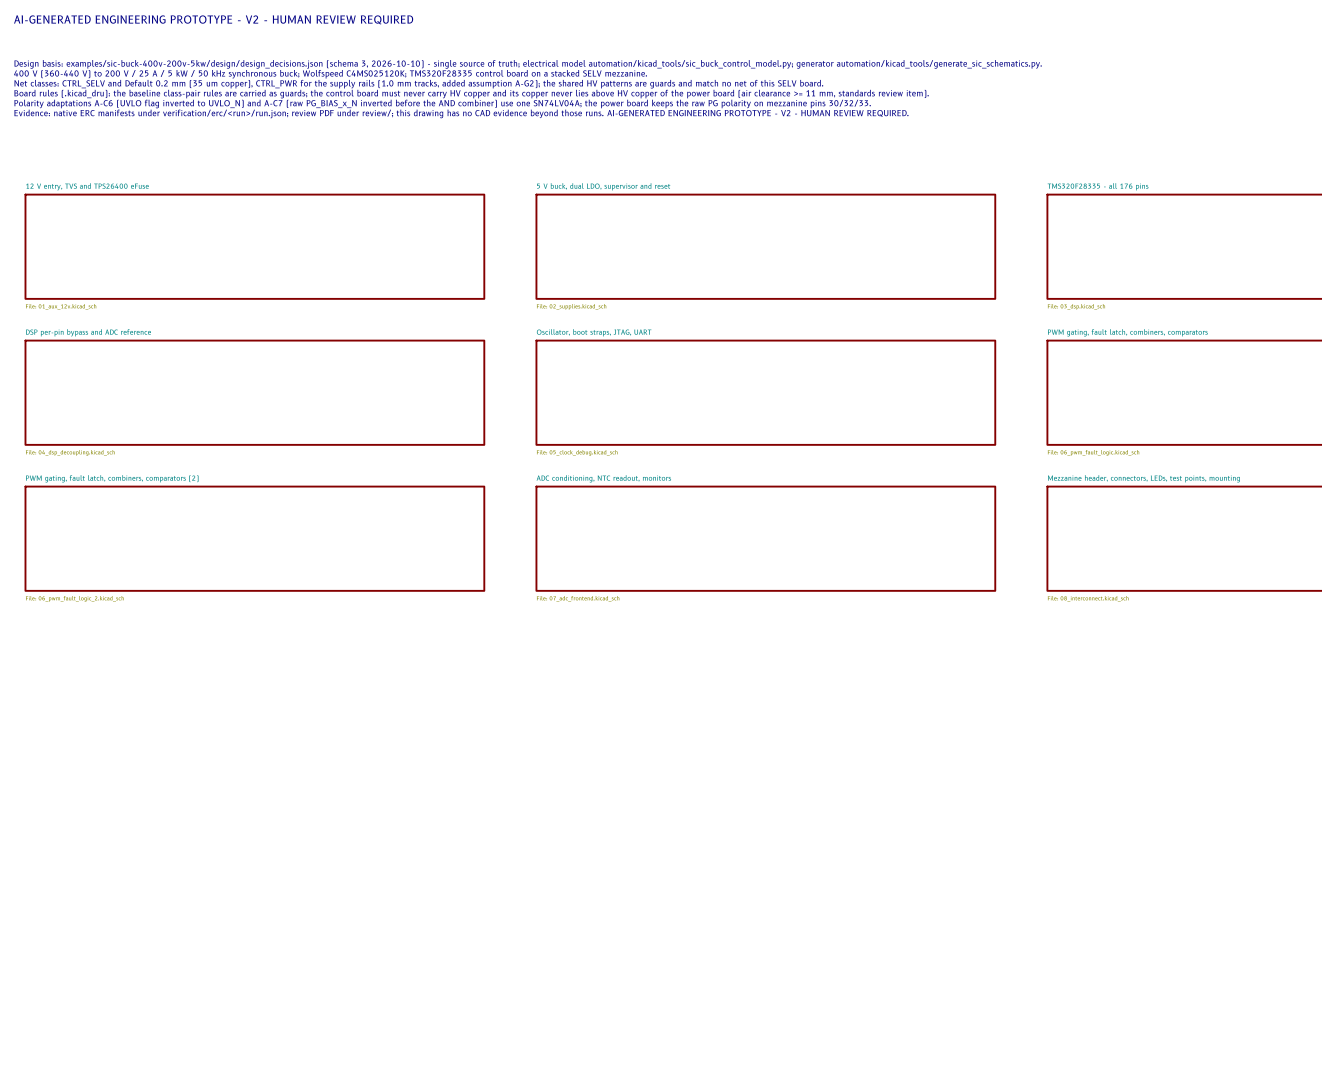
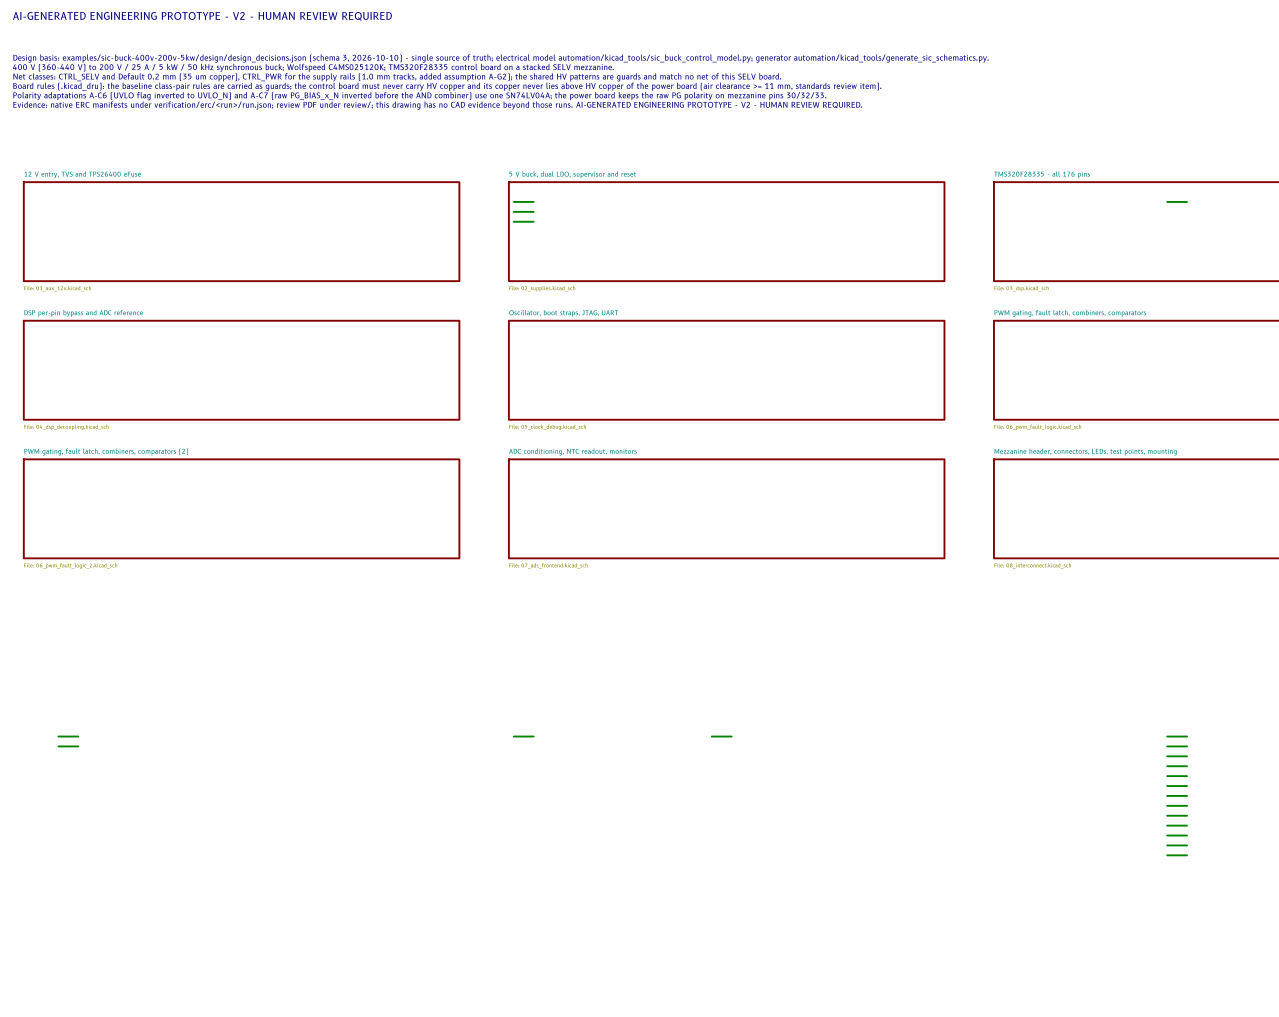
wire: none -> (513, 201) (533, 201)
wire: none -> (1167, 201) (1187, 201)
wire: none -> (513, 211) (533, 211)
wire: none -> (513, 221) (533, 221)
wire: none -> (58, 736) (78, 736)
wire: none -> (513, 736) (533, 736)
wire: none -> (711, 736) (731, 736)
wire: none -> (1167, 736) (1187, 736)
wire: none -> (58, 746) (78, 746)
wire: none -> (1167, 746) (1187, 746)
wire: none -> (1167, 756) (1187, 756)
wire: none -> (1167, 766) (1187, 766)
wire: none -> (1167, 776) (1187, 776)
wire: none -> (1167, 786) (1187, 786)
wire: none -> (1167, 795) (1187, 795)
wire: none -> (1167, 805) (1187, 805)
wire: none -> (1167, 815) (1187, 815)
wire: none -> (1167, 825) (1187, 825)
wire: none -> (1167, 835) (1187, 835)
wire: none -> (1167, 845) (1187, 845)
wire: none -> (1167, 855) (1187, 855)

